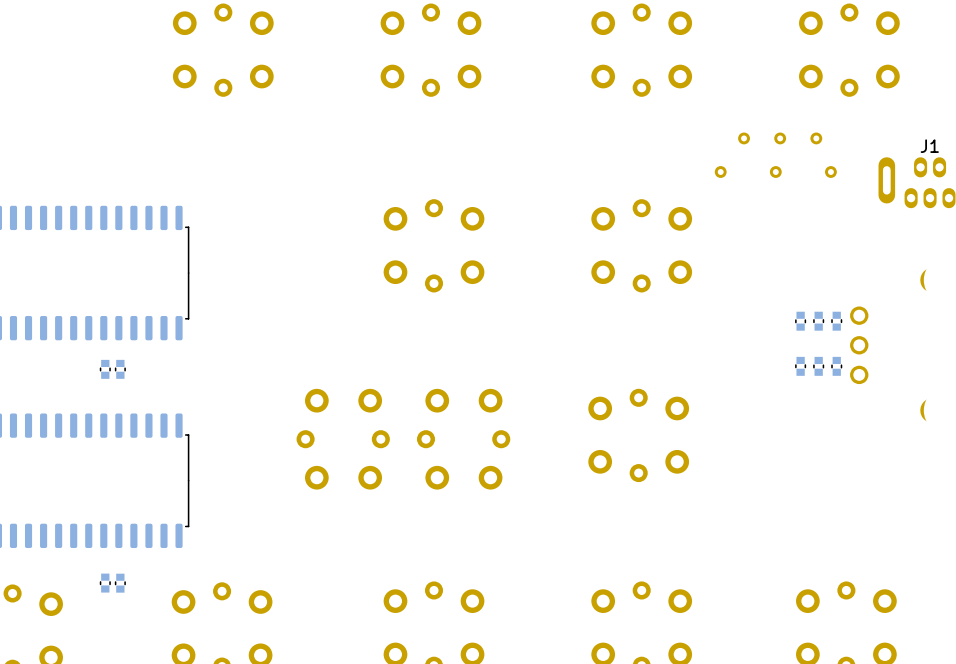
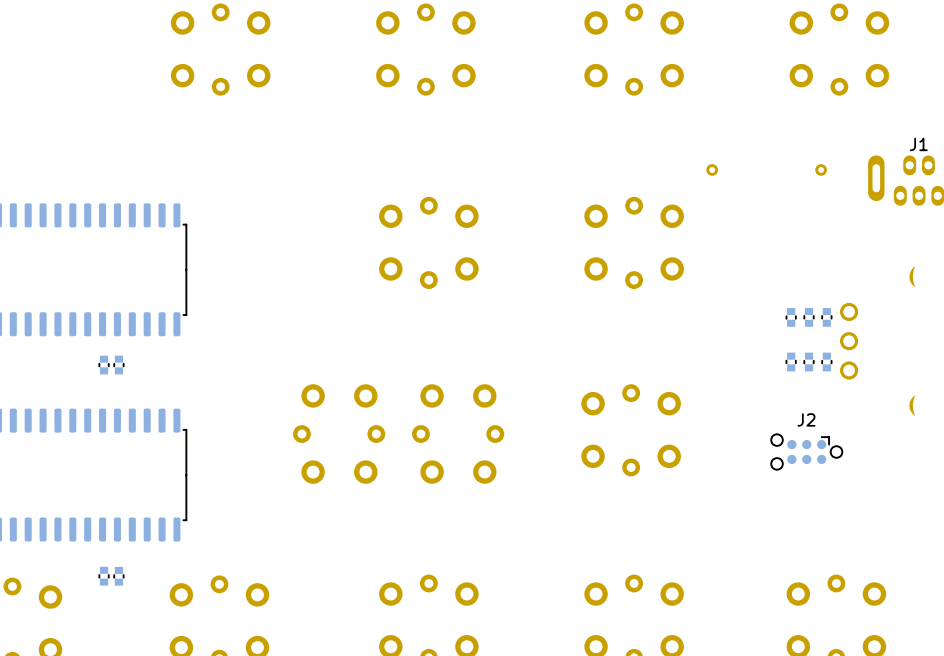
part: (744, 138) -> none
part: (780, 138) -> none
part: (816, 138) -> none
part: (775, 172) -> none
J2: none -> (806, 452)

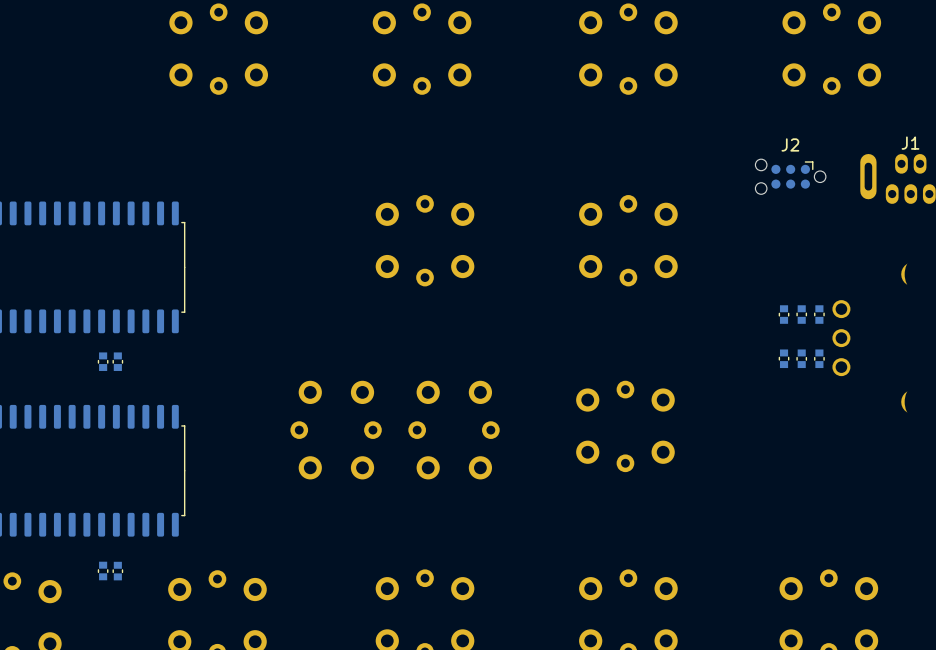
part: (712, 169) -> none
part: (821, 169) -> none
J2 position: (806, 452) -> (790, 176)

